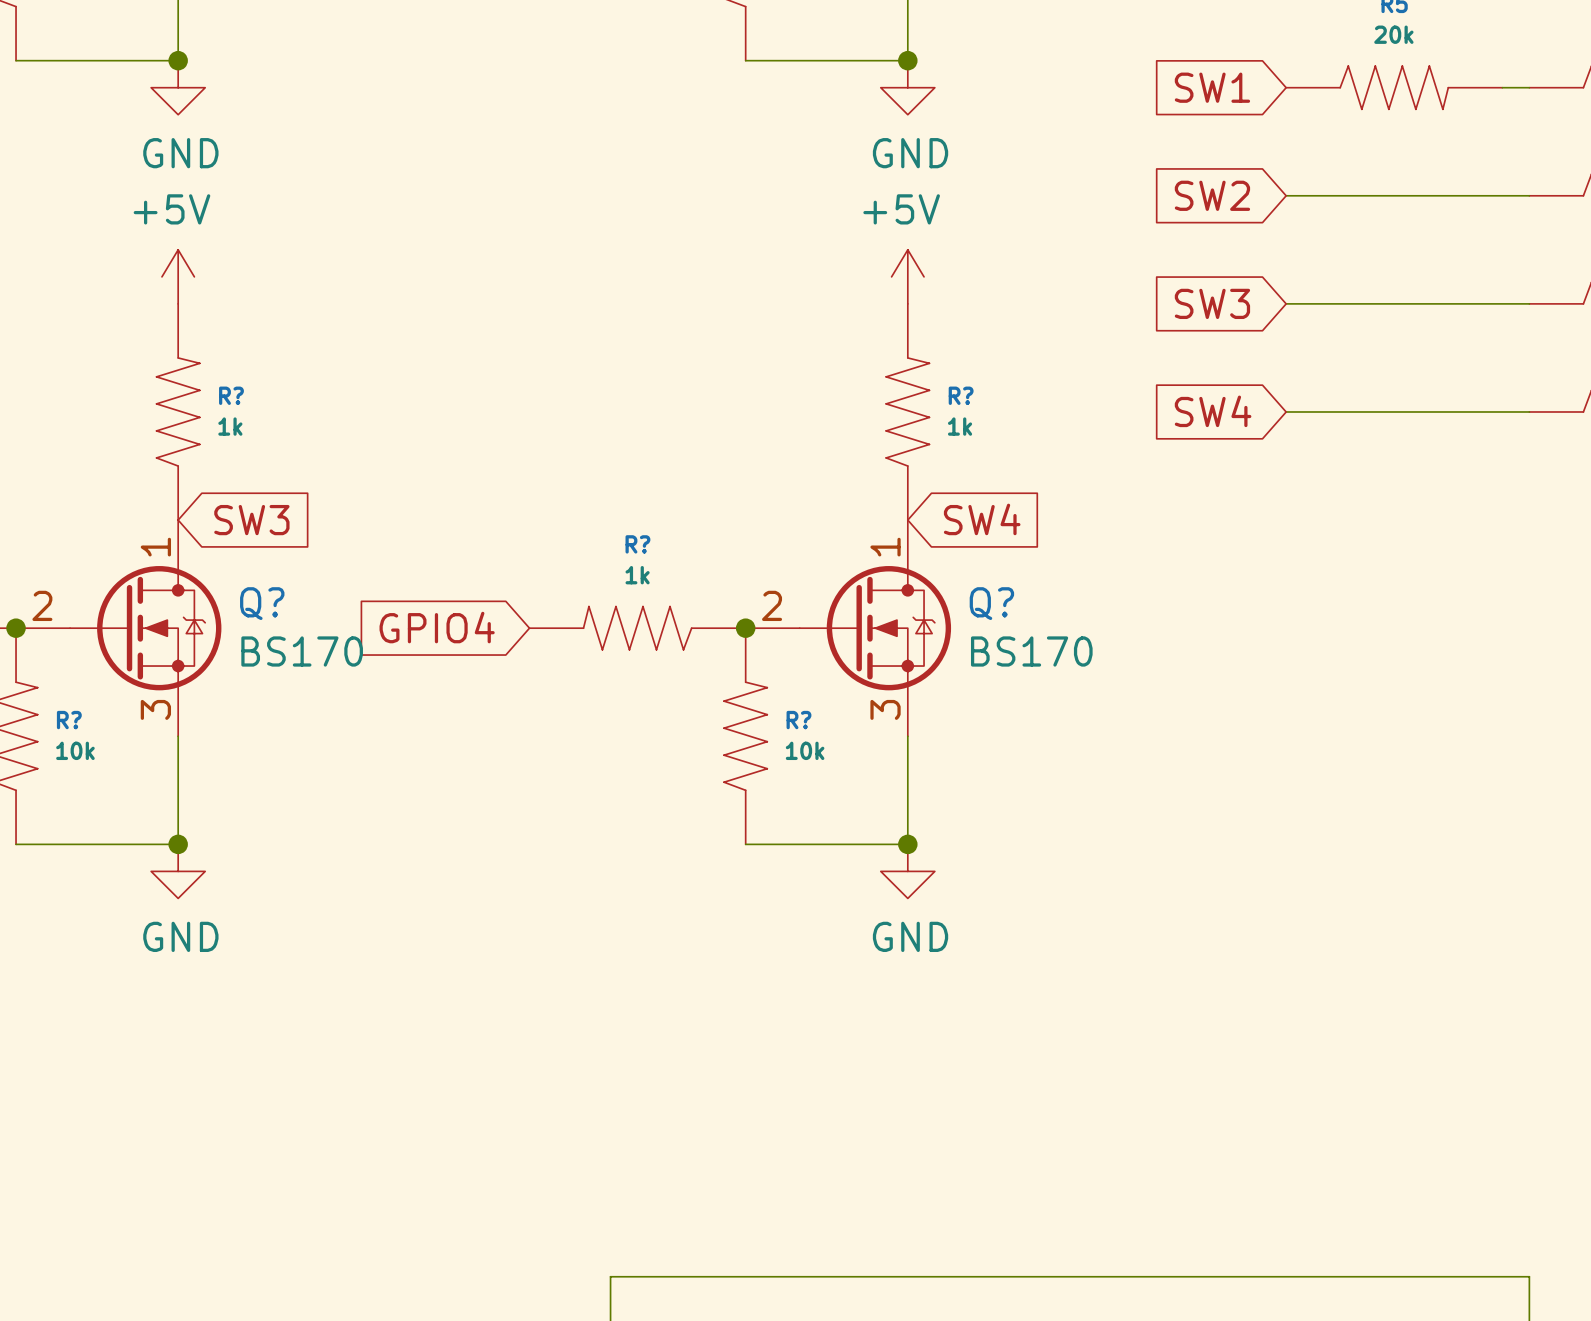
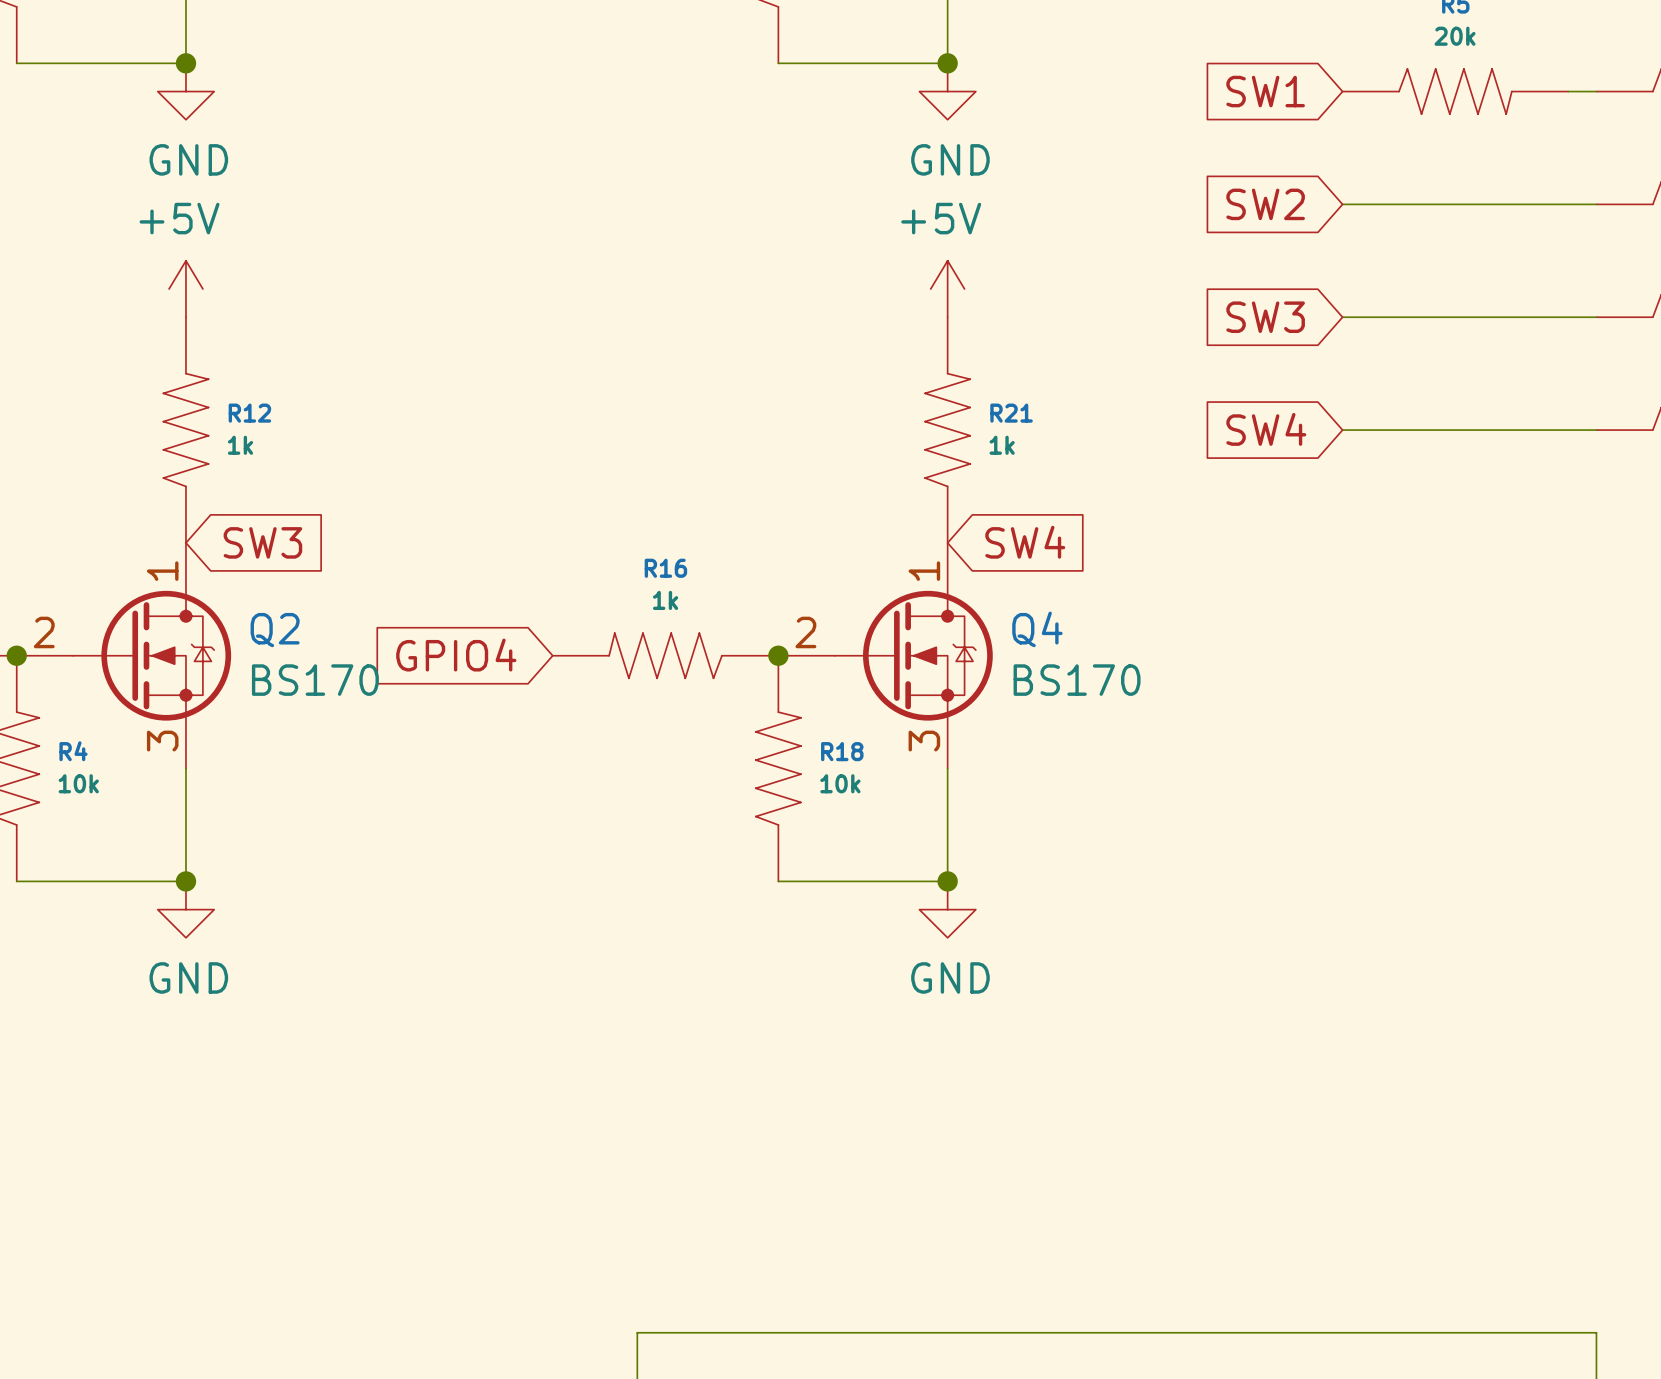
R? name: R? (231, 395) -> R12 (249, 413)
R? name: R? (961, 395) -> R21 (1011, 413)
R? name: R? (637, 544) -> R16 (665, 568)
Q? name: Q? (262, 603) -> Q2 (275, 630)
Q? name: Q? (991, 603) -> Q4 (1037, 629)
R? name: R? (69, 720) -> R4 (73, 751)
R? name: R? (798, 720) -> R18 (842, 751)

